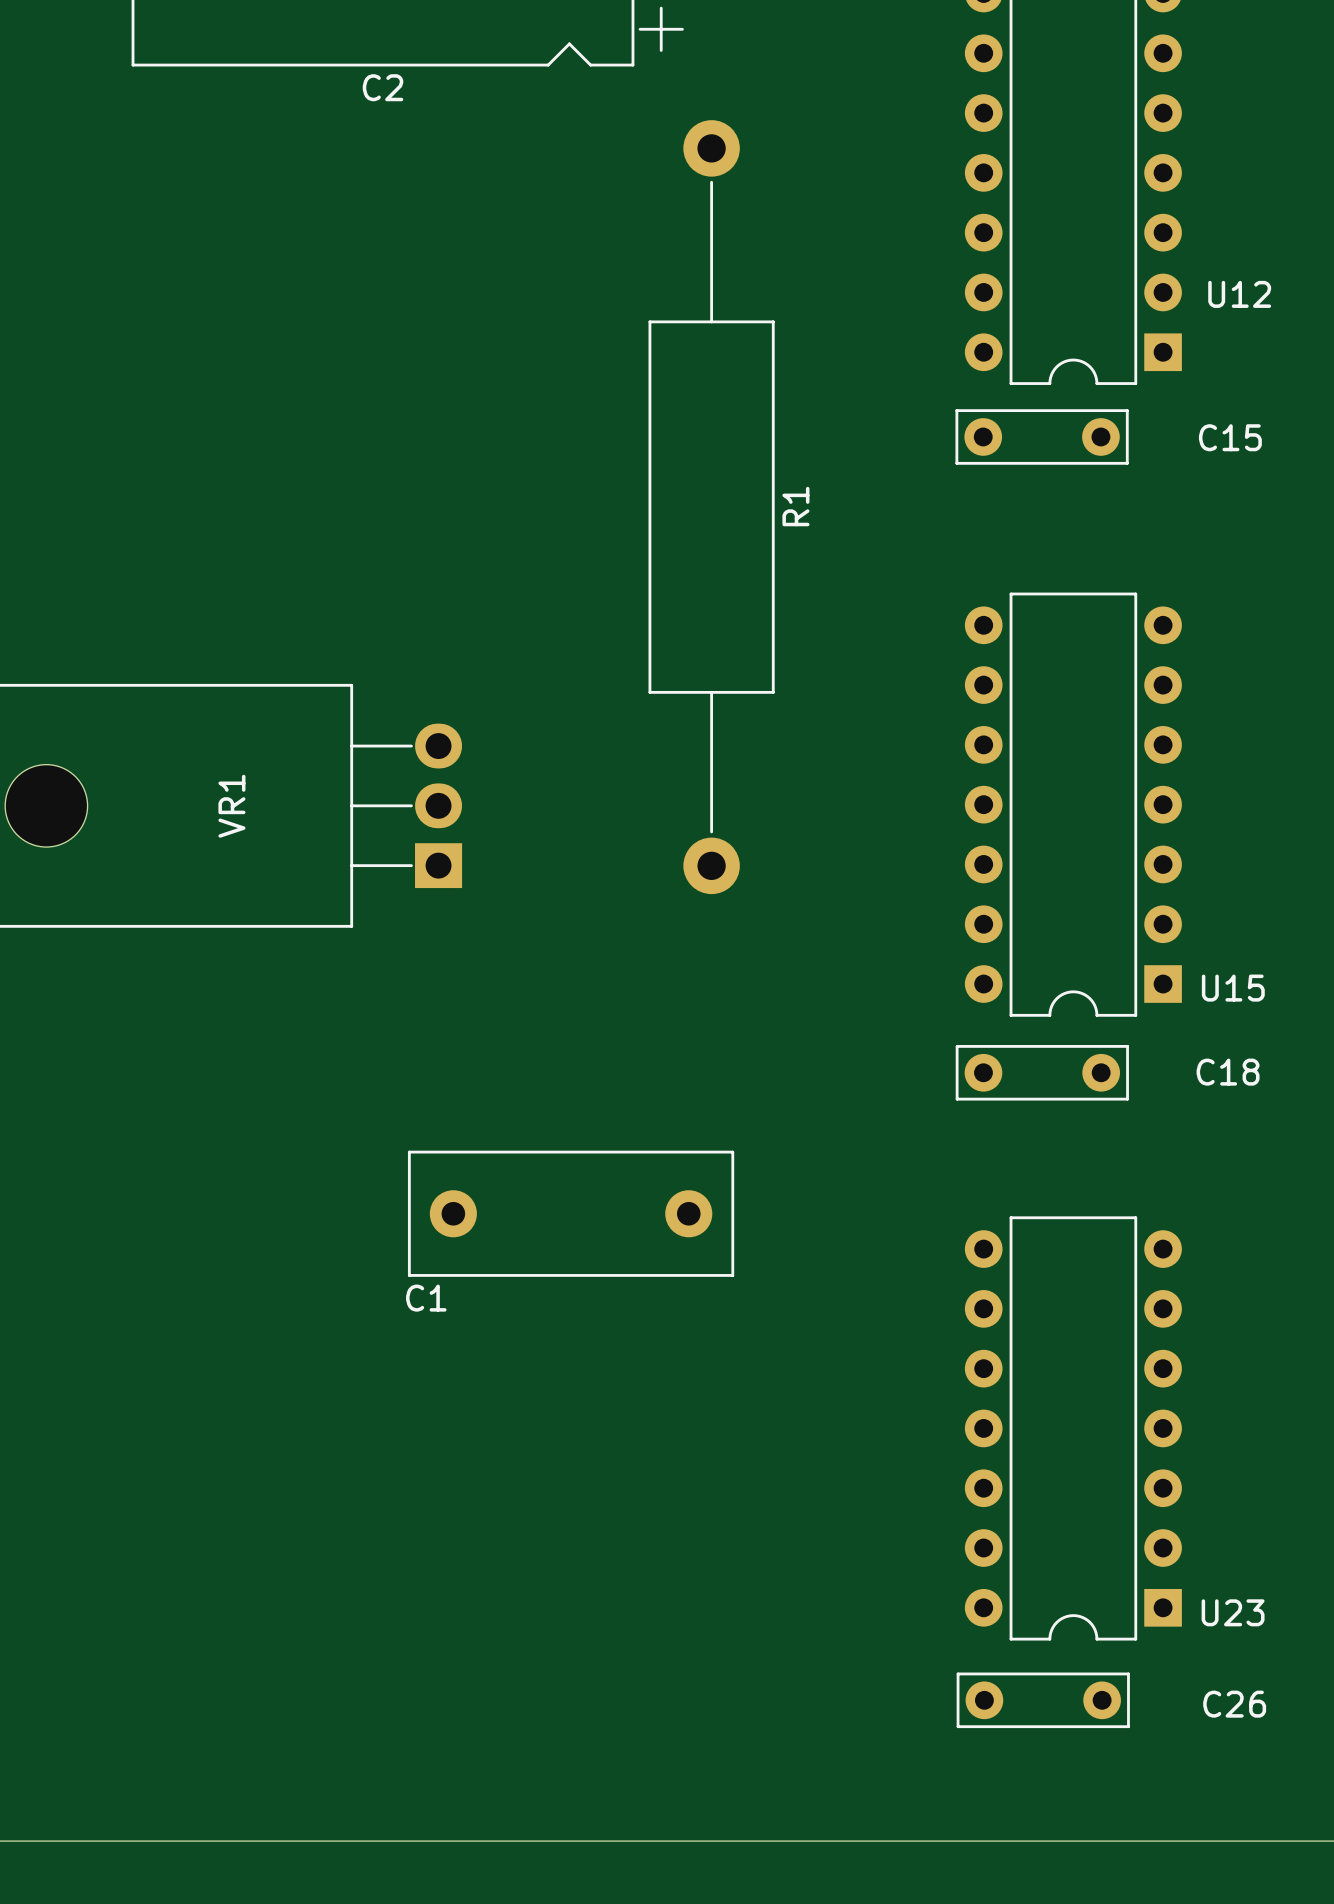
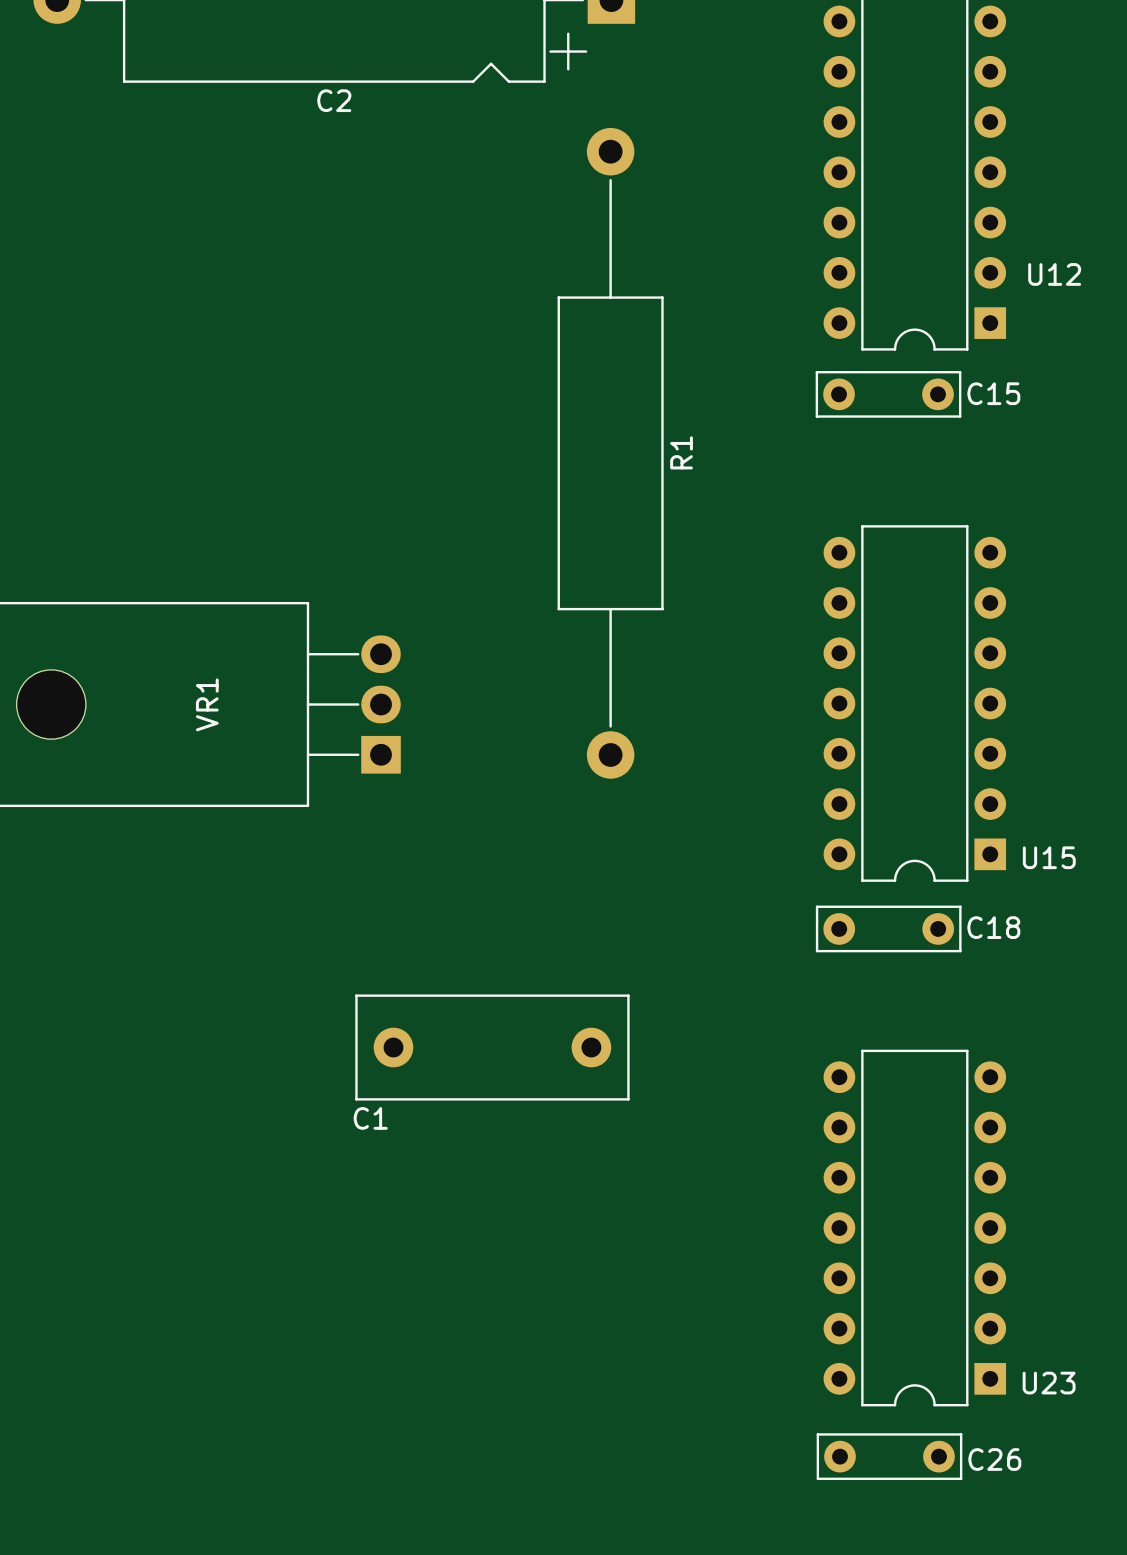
C15 name position: C15 (1230, 437) -> C15 (993, 393)
C18 name position: C18 (1228, 1072) -> C18 (993, 927)
C26 name position: C26 (1234, 1704) -> C26 (994, 1459)

